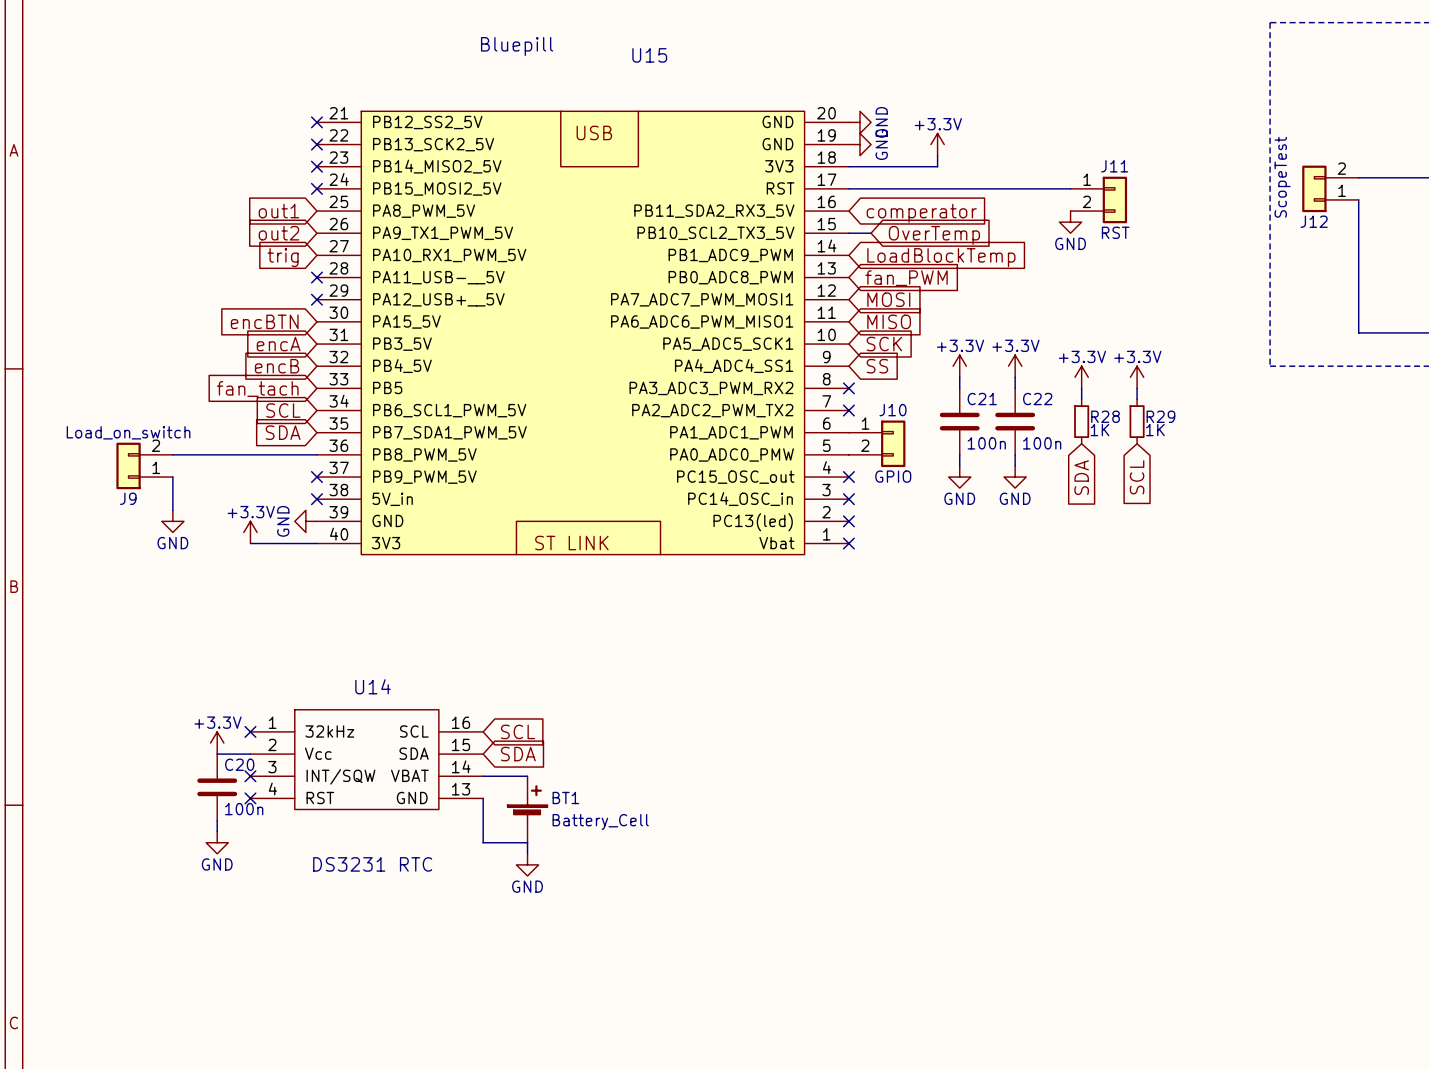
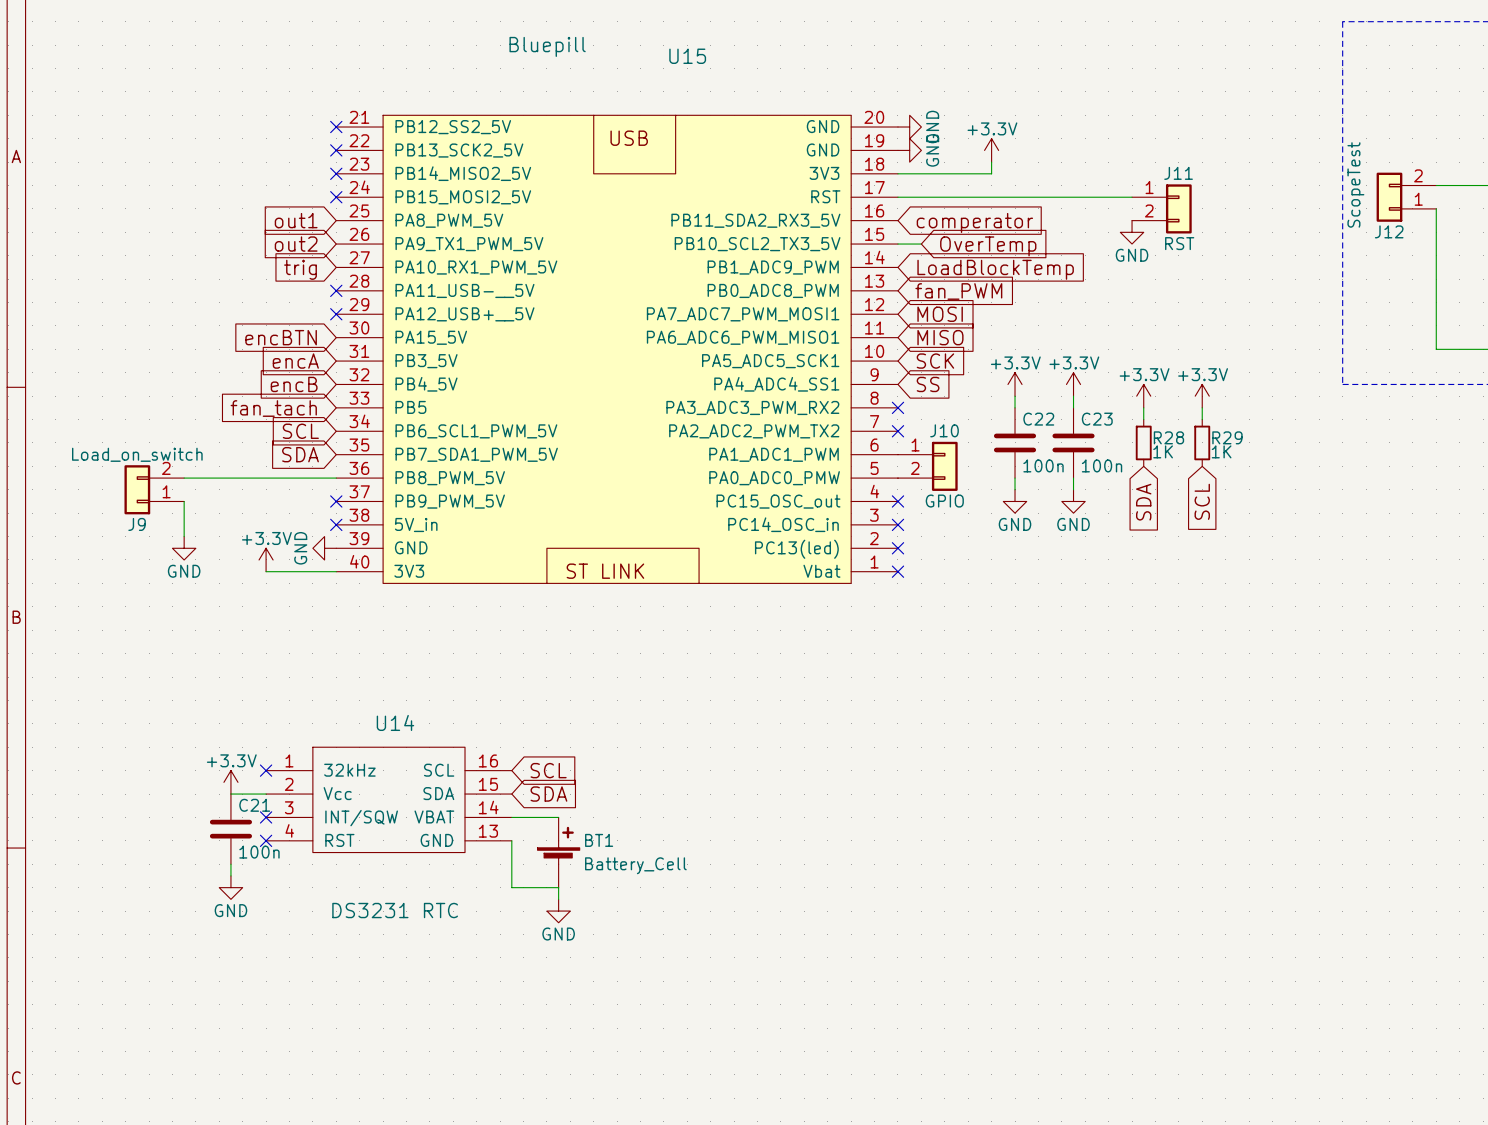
C21 name: C21 (982, 399) -> C22 (1038, 419)
C22 name: C22 (1037, 399) -> C23 (1097, 419)
C20 name: C20 (239, 764) -> C21 (254, 805)

